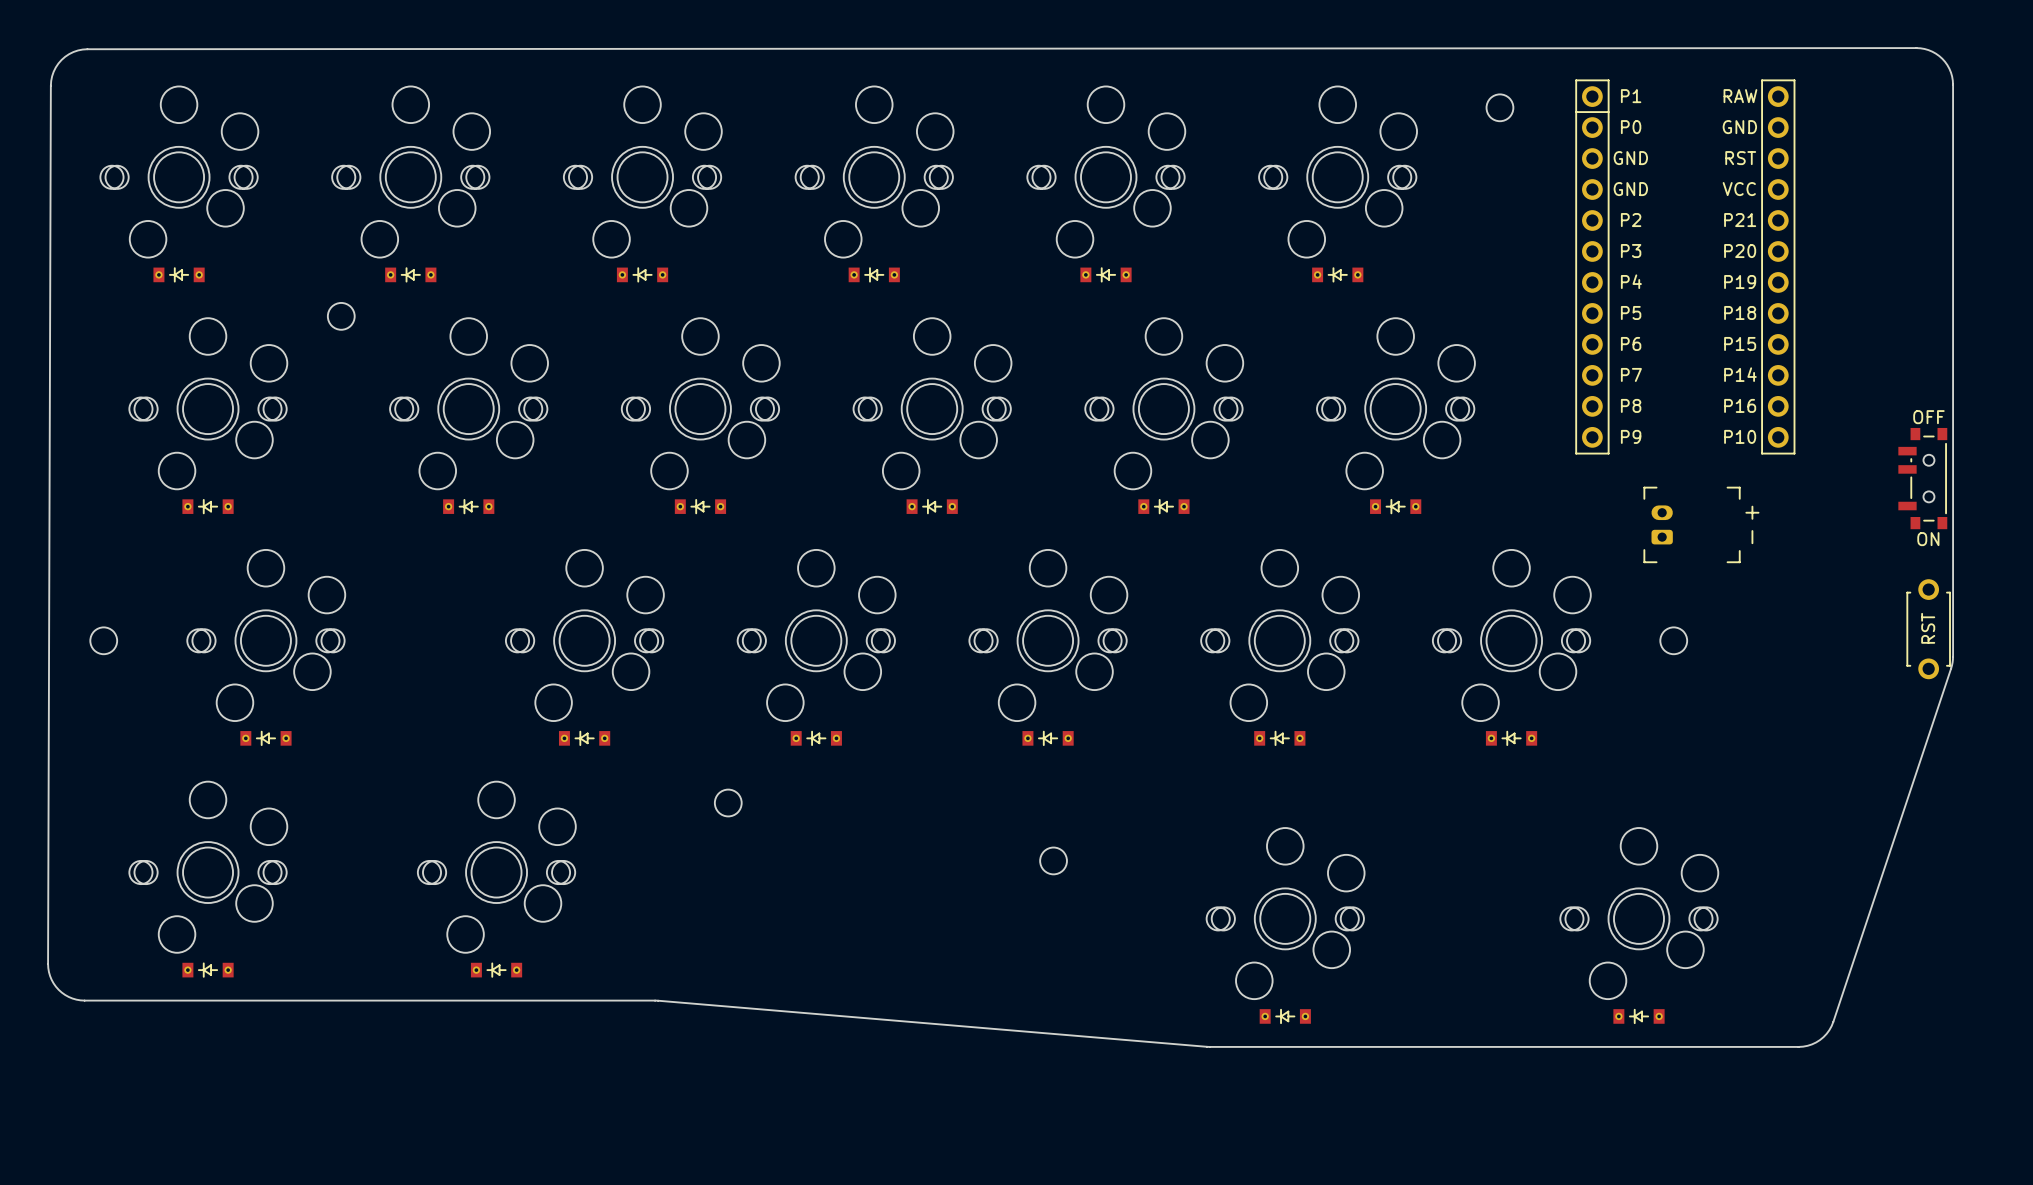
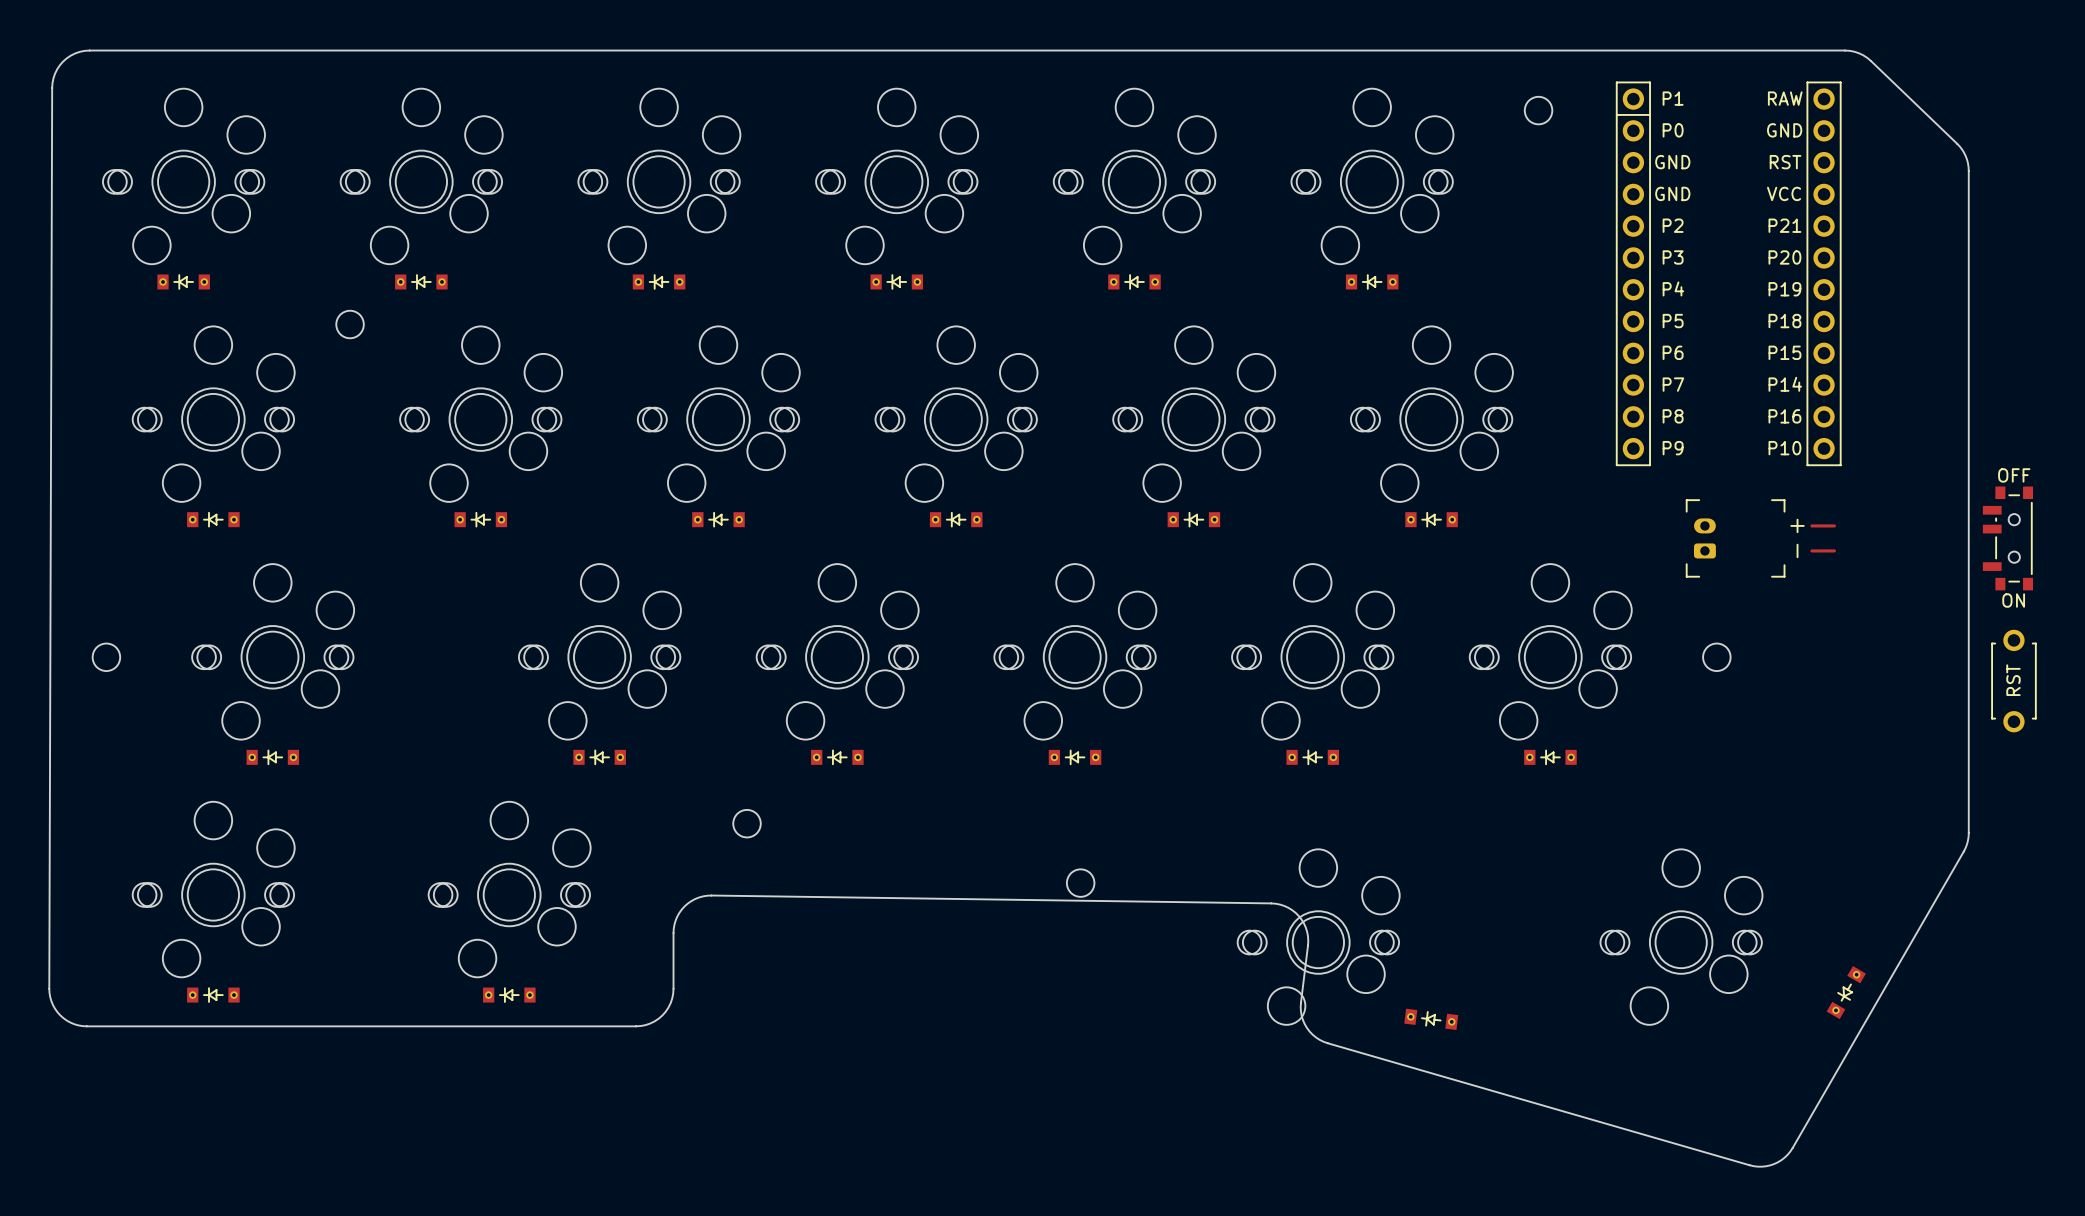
board edge: (50, 85) (53, 71) (61, 59) (73, 52) (87, 49) (1916, 48) (1935, 53) (1947, 65) (1953, 84) (1952, 662) (1833, 1021) (1829, 1030) (1820, 1040) (1812, 1044) (1798, 1046) (1208, 1046) (658, 1000) (620, 1000) -> (52, 87) (55, 73) (63, 61) (75, 53) (89, 50) (1844, 50) (1858, 53) (1870, 60) (1962, 149) (1967, 159) (1968, 170) (1968, 839) (1963, 851) (1792, 1147) (1781, 1160) (1766, 1166) (1749, 1165) (1319, 1039) (1306, 1027) (1300, 1011) (1308, 941) (1305, 927) (1295, 913) (1284, 906) (1275, 903) (703, 896) (684, 906) (675, 920) (673, 933) (673, 993) (668, 1007) (654, 1021) (635, 1026)
part position: (1922, 478) -> (2007, 538)
track: none -> (1811, 525) (1834, 525)
track: none -> (1811, 550) (1834, 550)
part position: (1928, 629) -> (2013, 681)
part: none -> (1846, 992)
part: none -> (1431, 1019)
part: (1285, 1016) -> none
part: (1638, 1016) -> none

